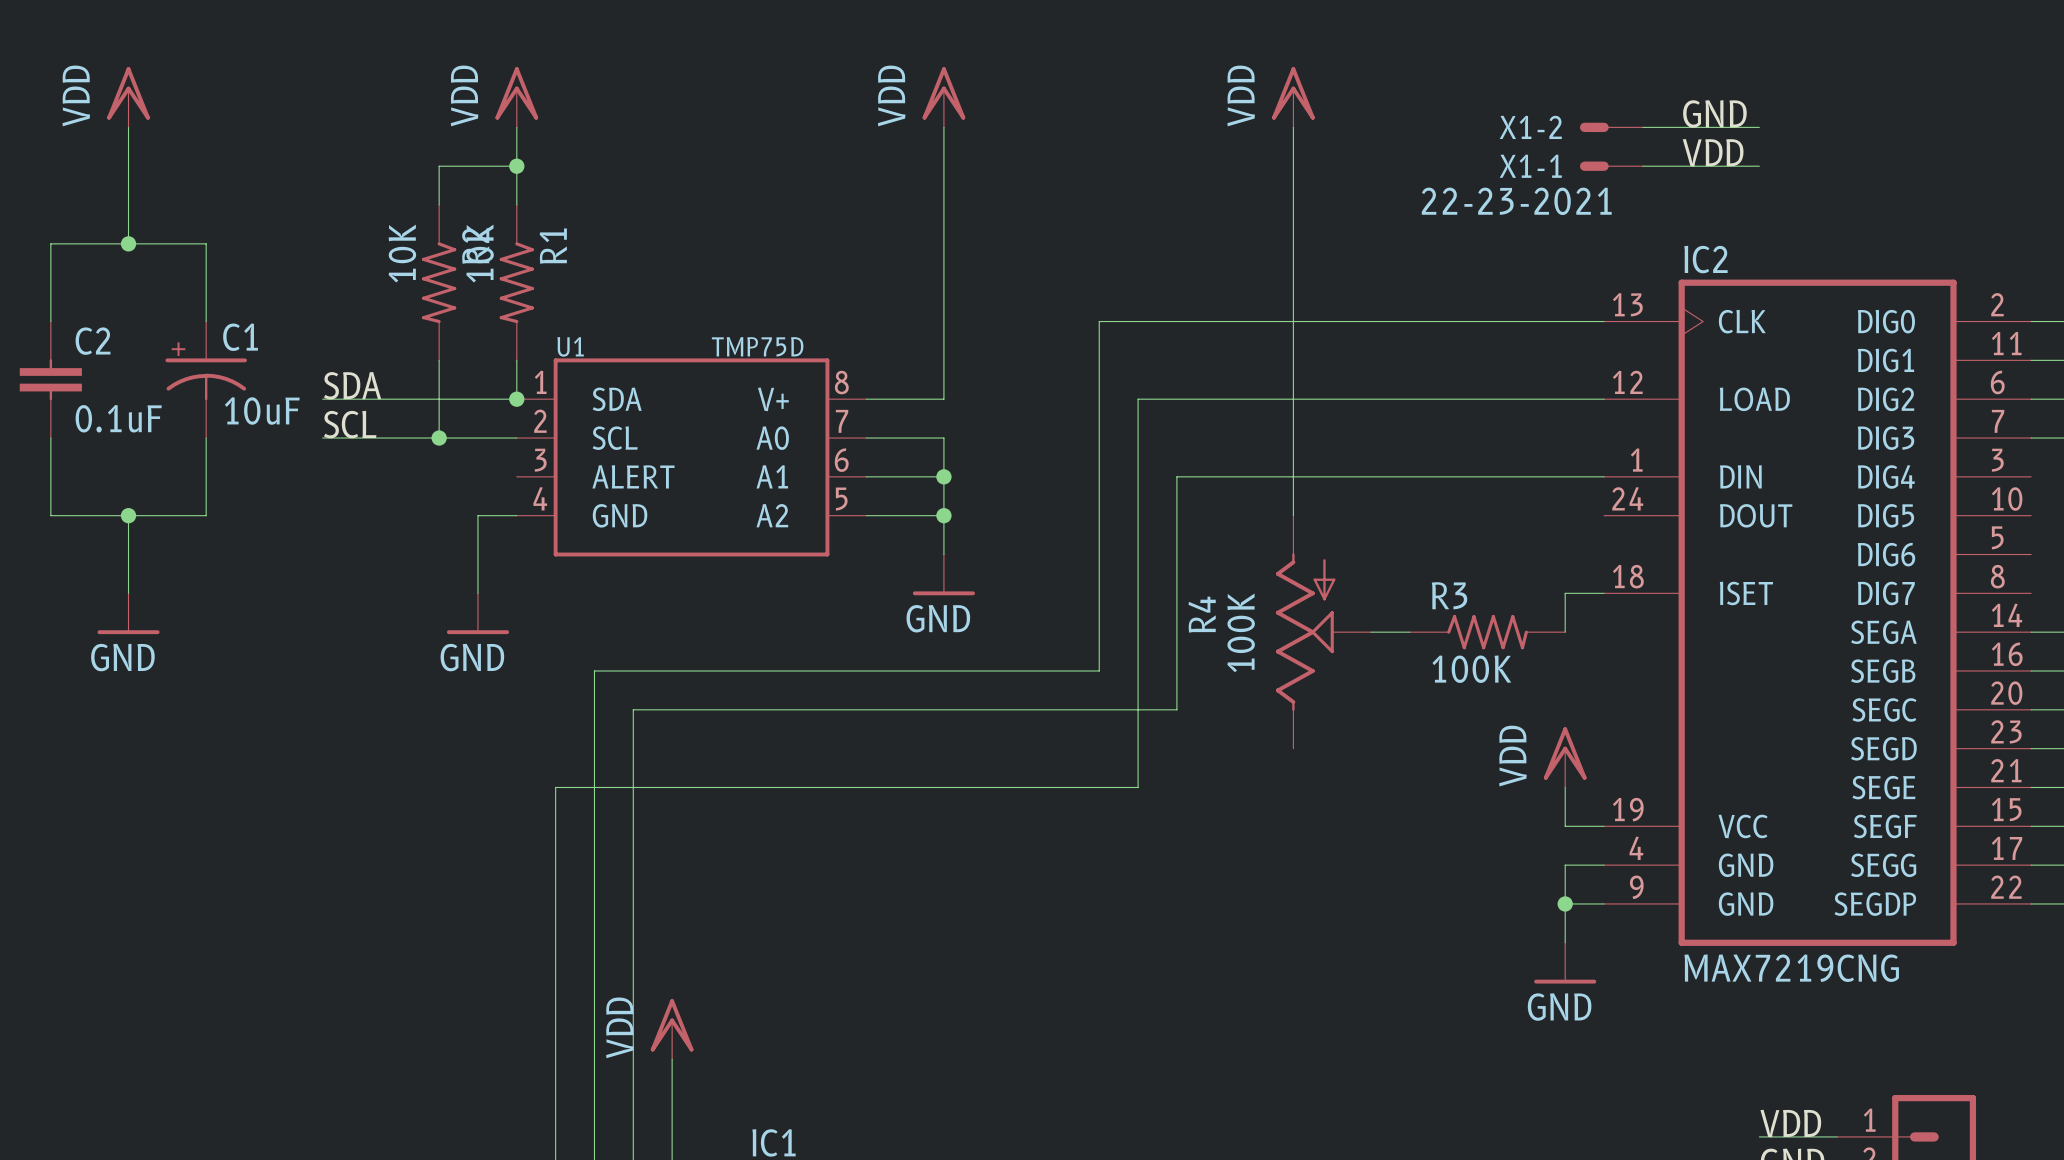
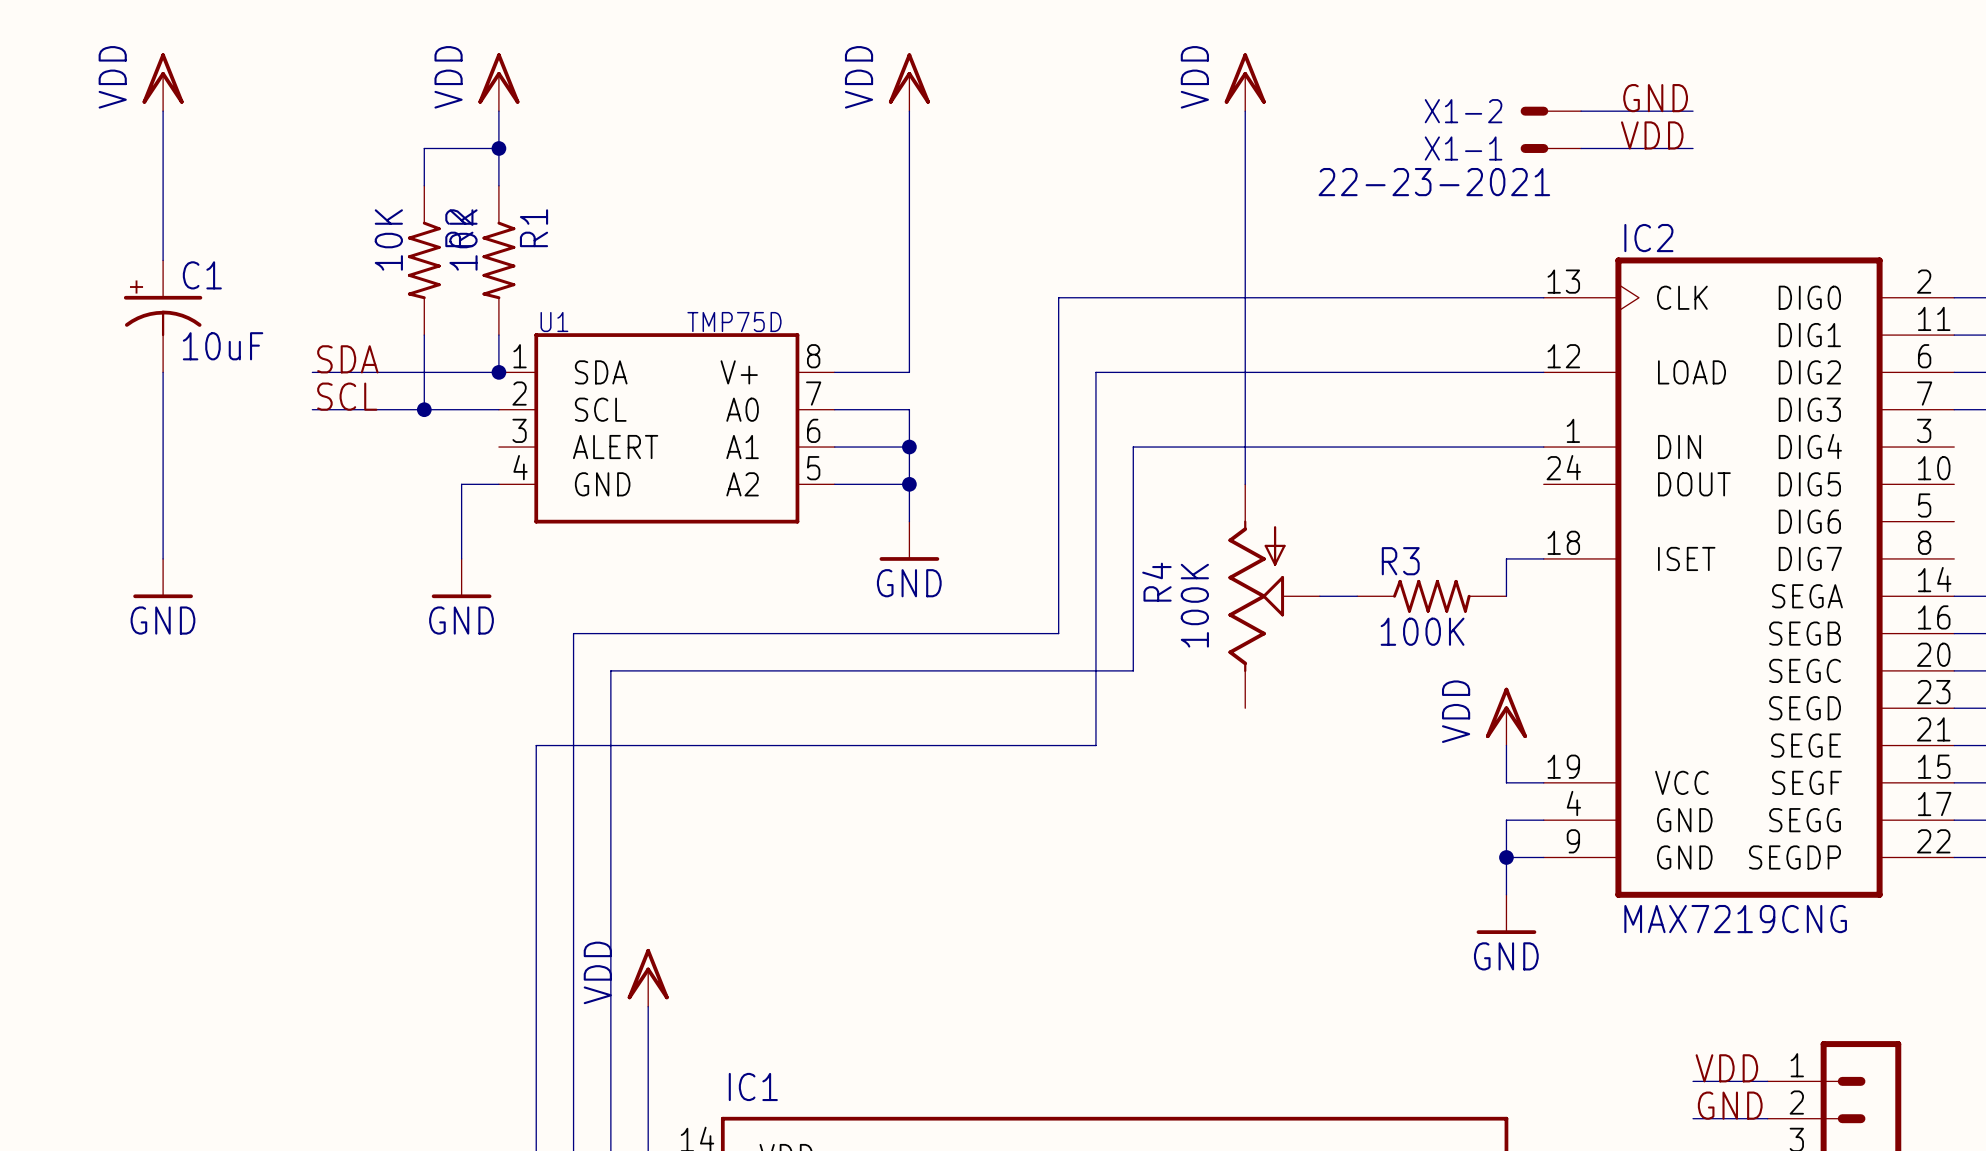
power symbol position: VDD (128, 97) -> VDD (163, 82)
wire: (128, 127) (128, 243) -> none
wire: none -> (163, 111) (163, 260)
junction: (128, 243) -> none
wire: (50, 321) (50, 243) (206, 243) (206, 321) -> none
C2: 0.1uF (50, 379) -> none
C1 position: (206, 379) -> (163, 316)
wire: none -> (163, 372) (163, 558)
wire: (50, 438) (50, 515) (206, 515) (206, 438) -> none
wire: (128, 515) (128, 593) -> none
junction: (128, 515) -> none
power symbol position: GND (128, 613) -> GND (163, 578)

